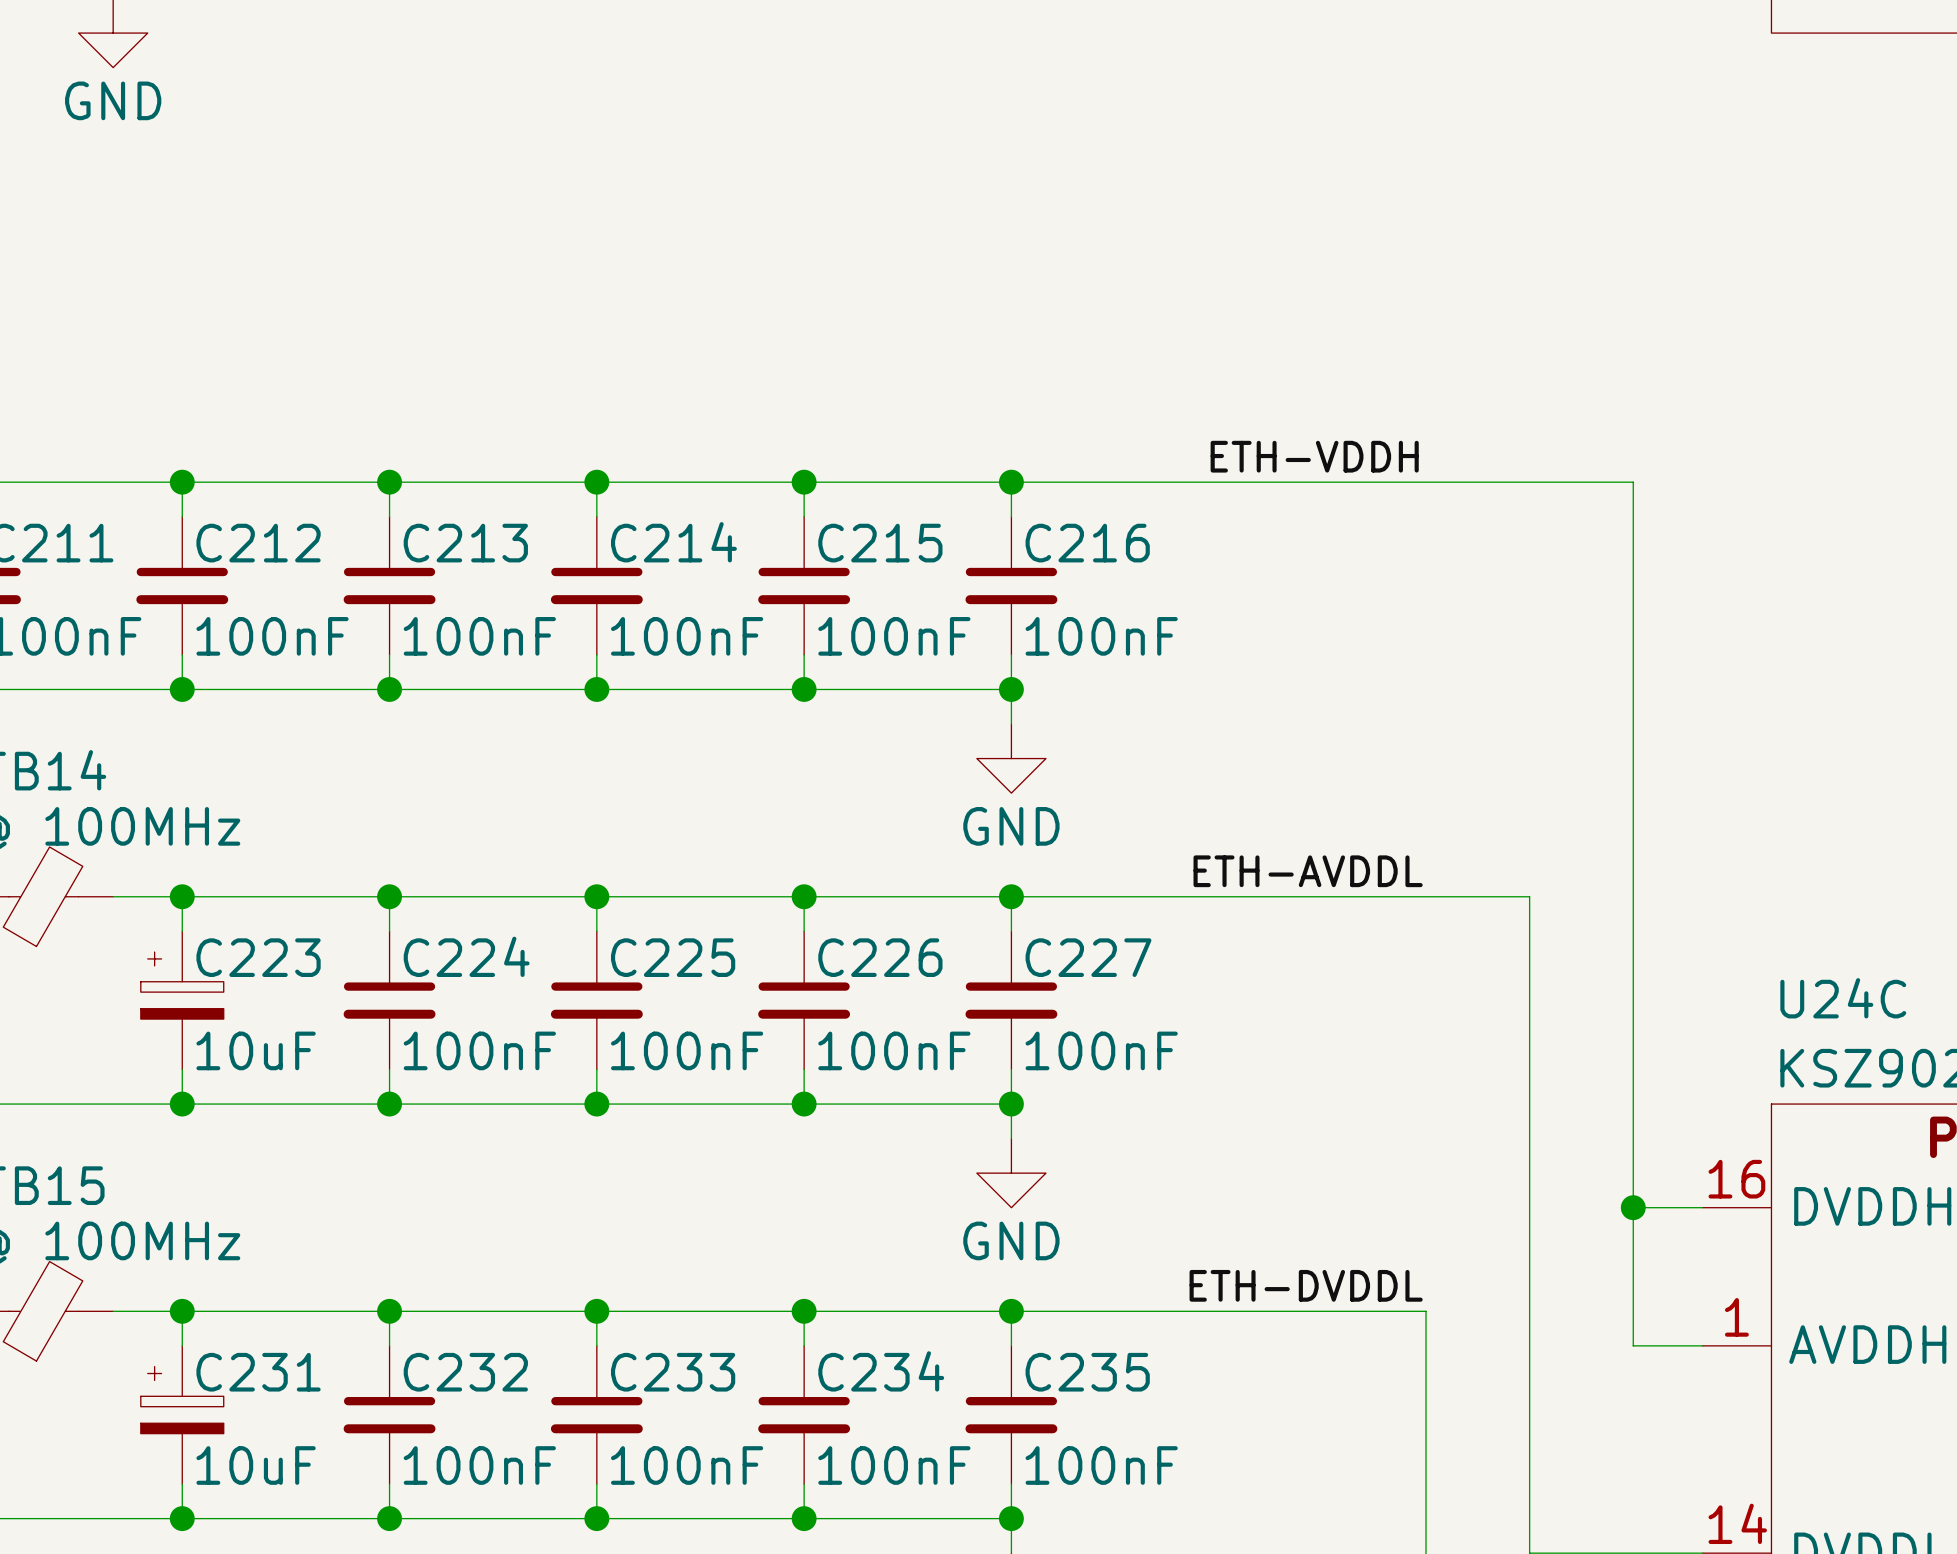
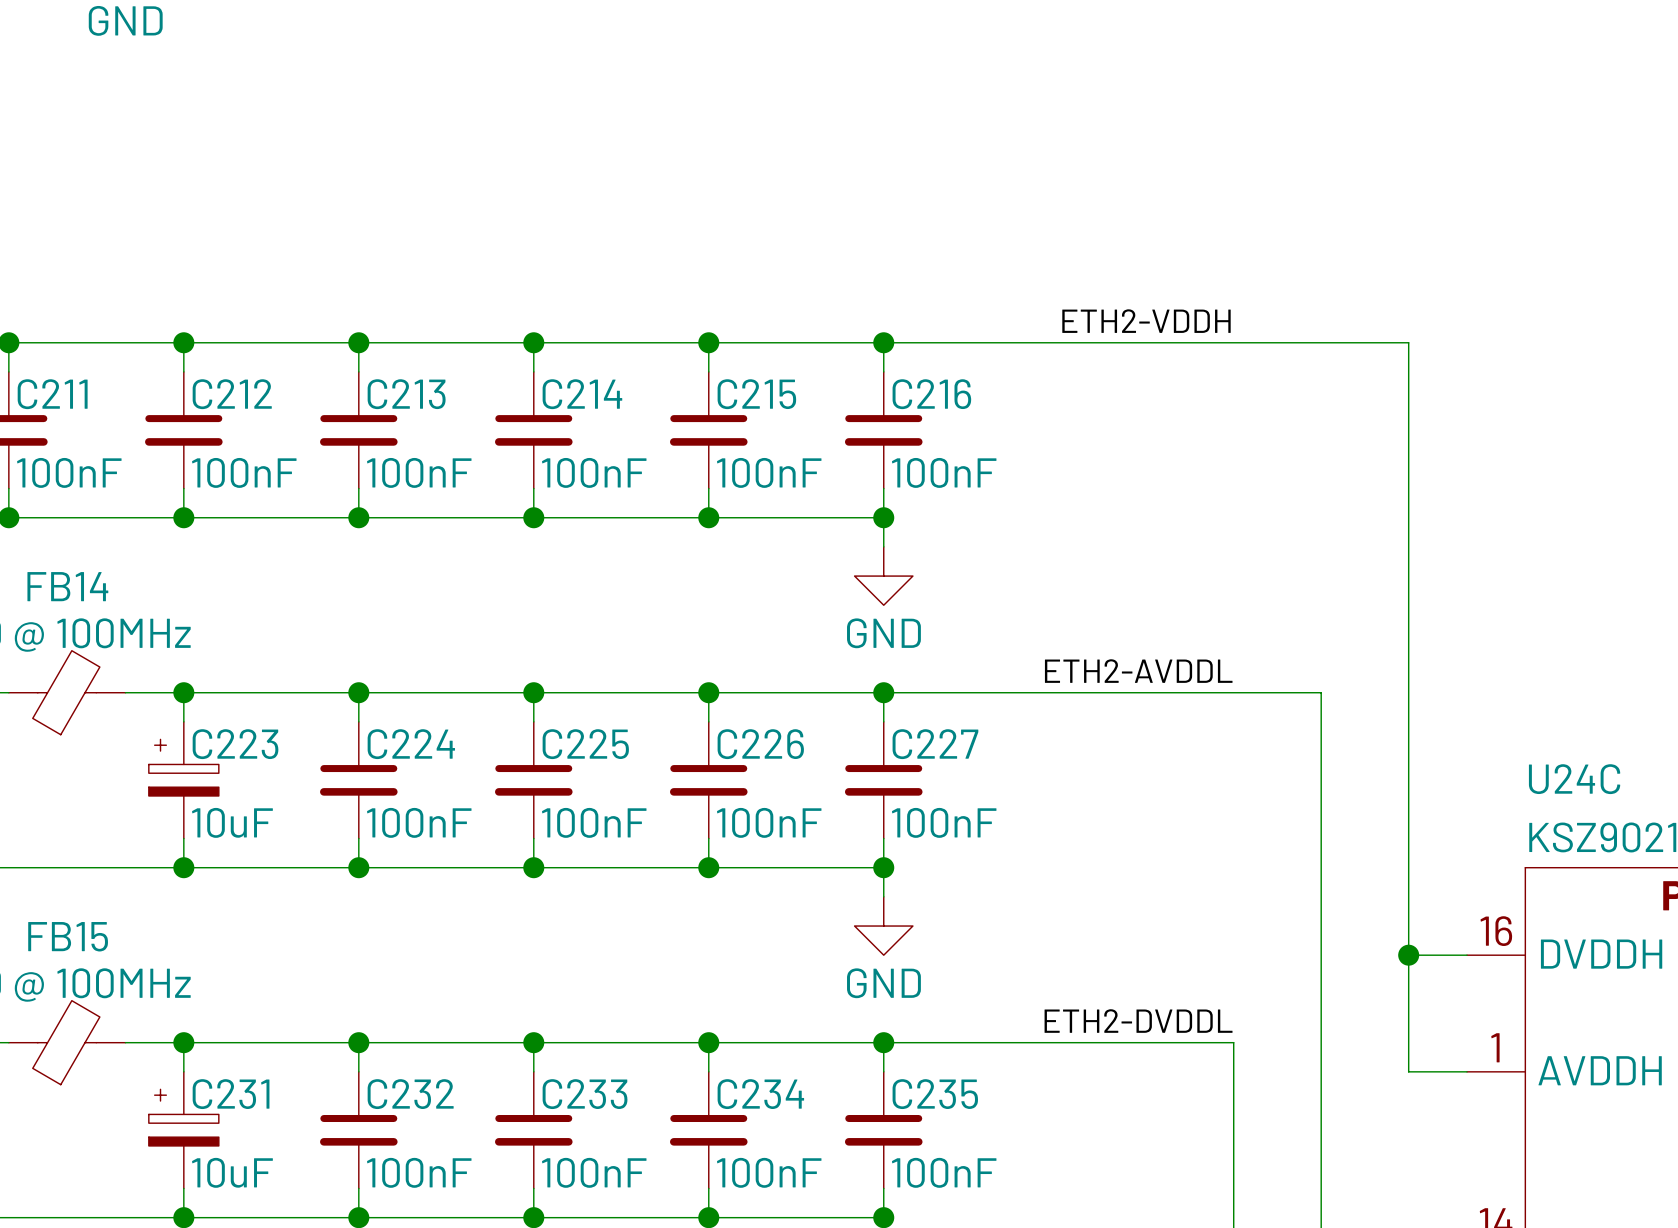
label: ETH-VDDH (1314, 456) -> ETH2-VDDH (1146, 321)
label: ETH-AVDDL (1308, 871) -> ETH2-AVDDL (1138, 671)
label: ETH-DVDDL (1306, 1285) -> ETH2-DVDDL (1138, 1021)

